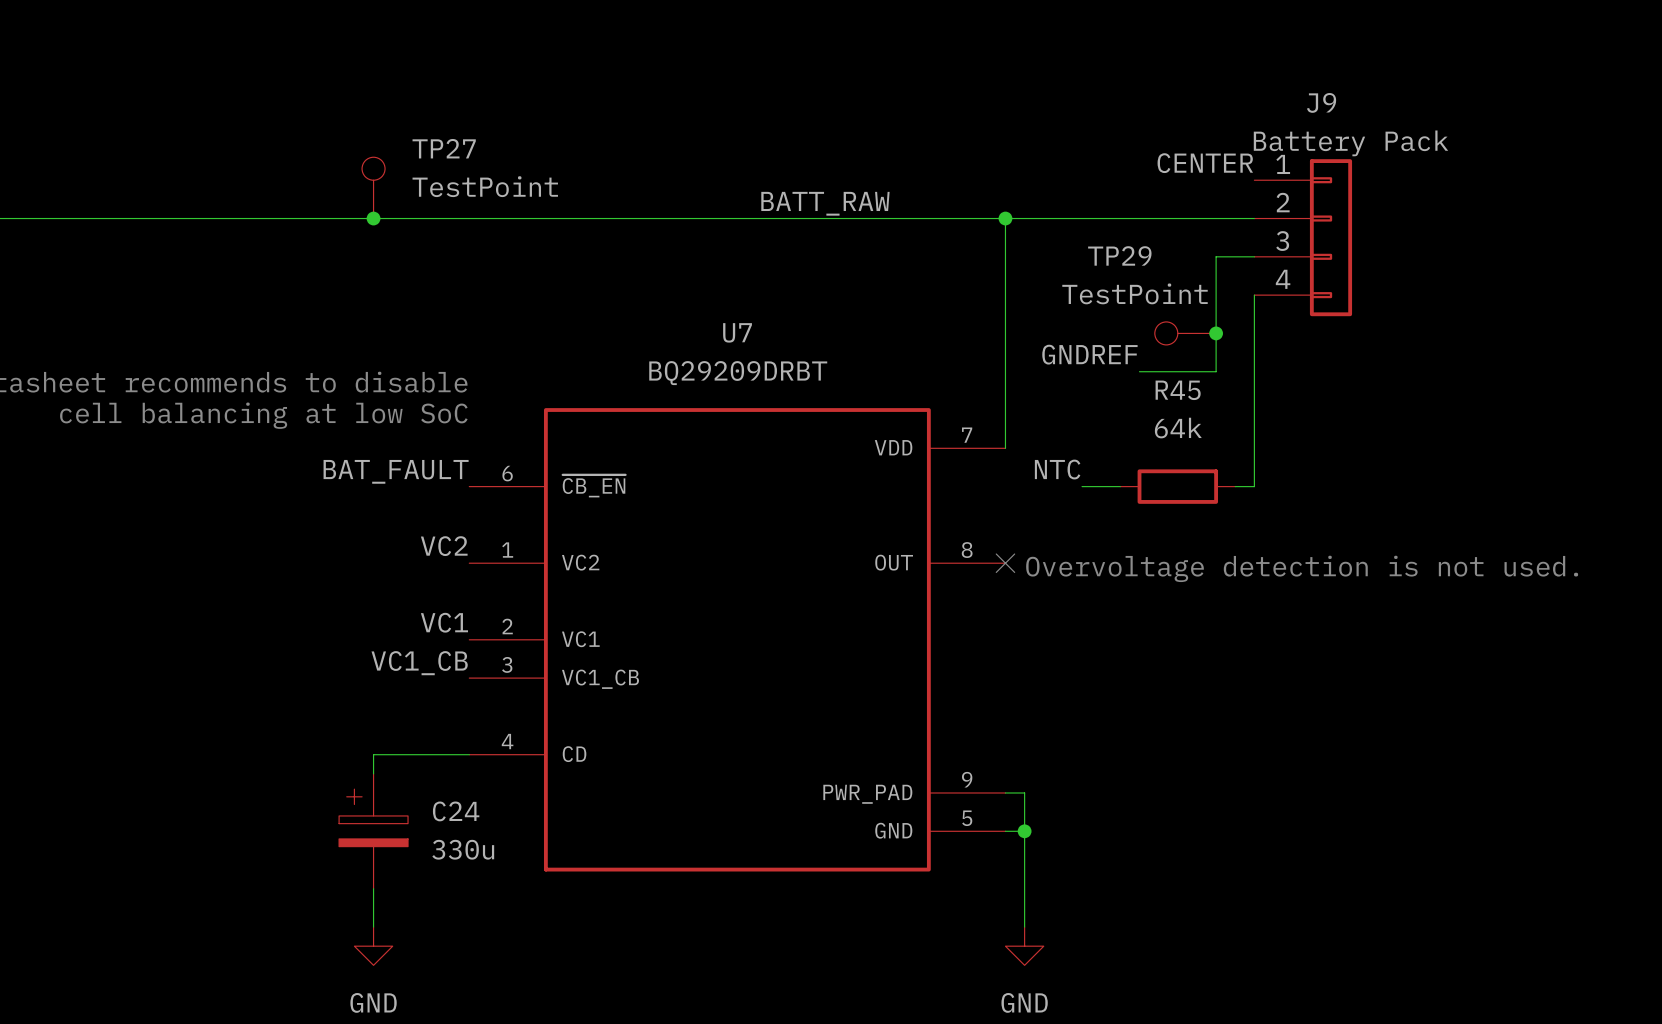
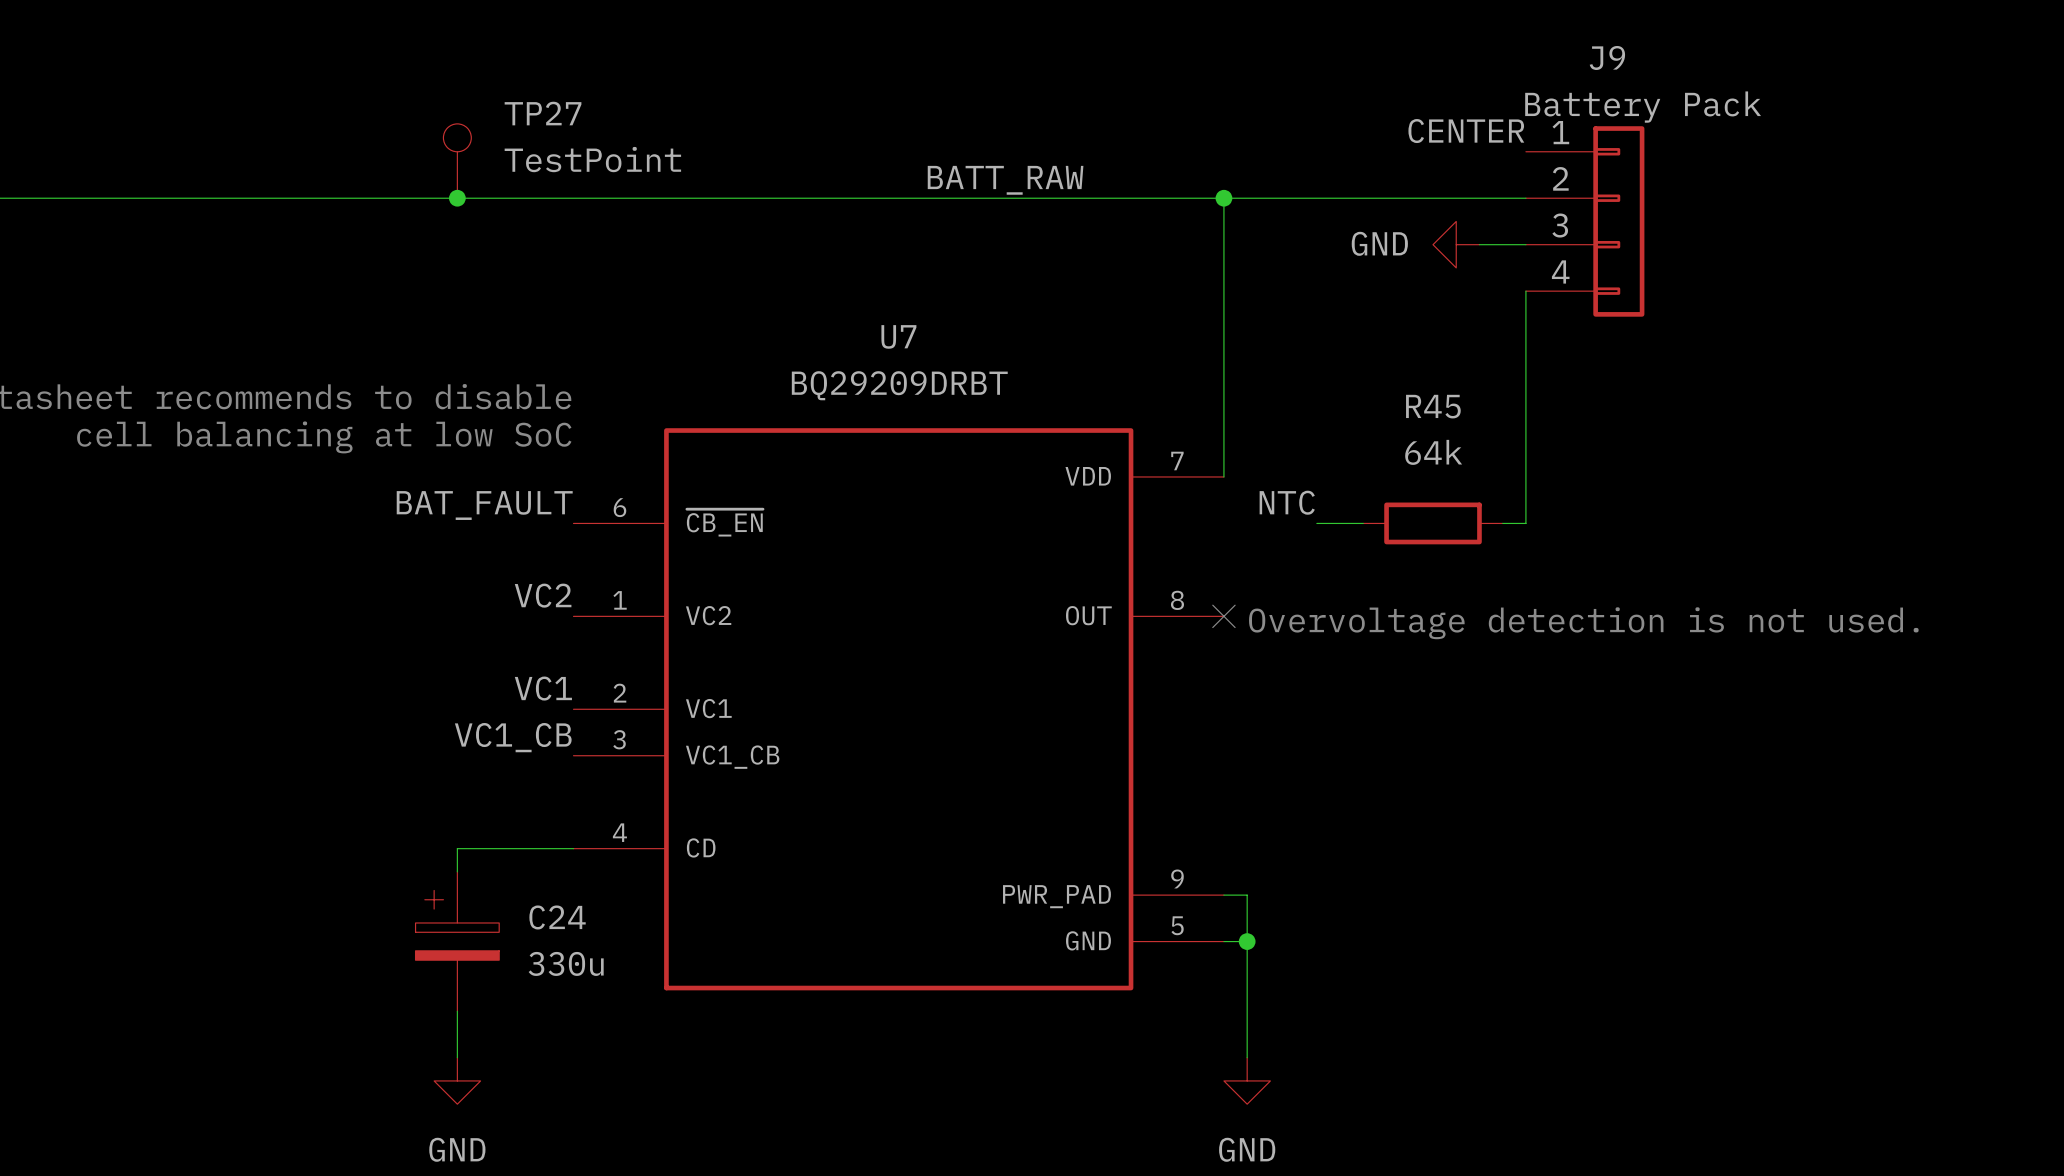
power symbol: none -> GND (1456, 244)
wire: (1216, 256) (1216, 371) (1139, 371) -> none
TP29: TestPoint (1185, 333) -> none
junction: (1216, 333) -> none
label: GNDREF (1089, 354) -> none

